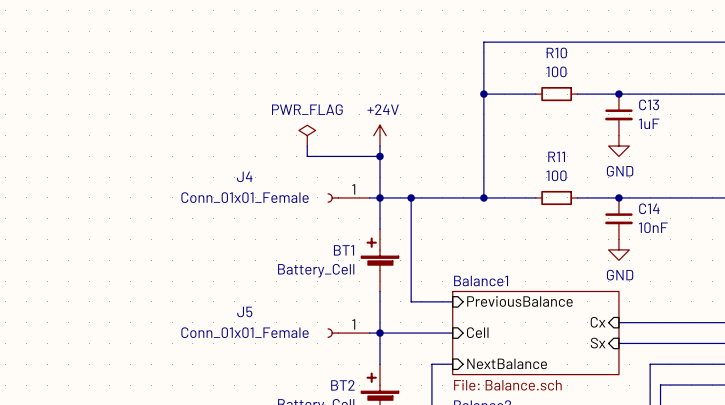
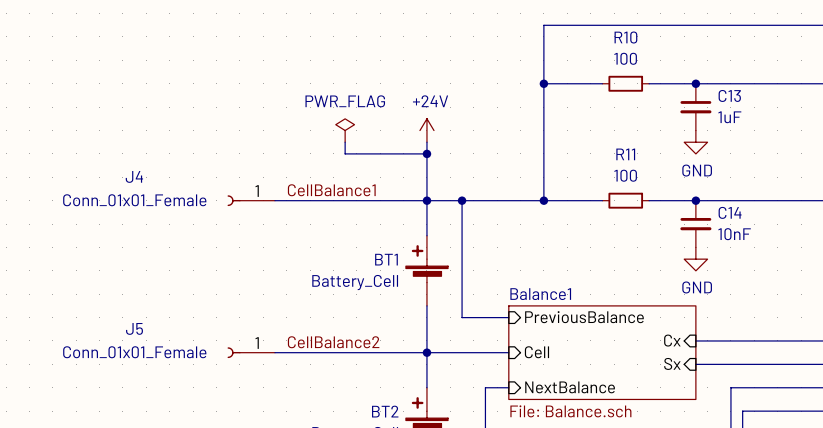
label: none -> CellBalance1 (331, 190)
wire: none -> (274, 200) (415, 200)
J4 position: (348, 197) -> (251, 200)
label: none -> CellBalance2 (333, 342)
wire: none -> (274, 352) (415, 352)
J5 position: (348, 333) -> (251, 352)

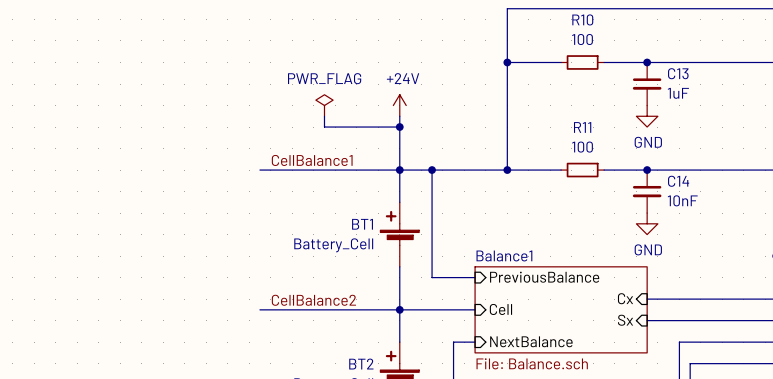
J4: Conn_01x01_Female (251, 200) -> none
J5: Conn_01x01_Female (251, 352) -> none

